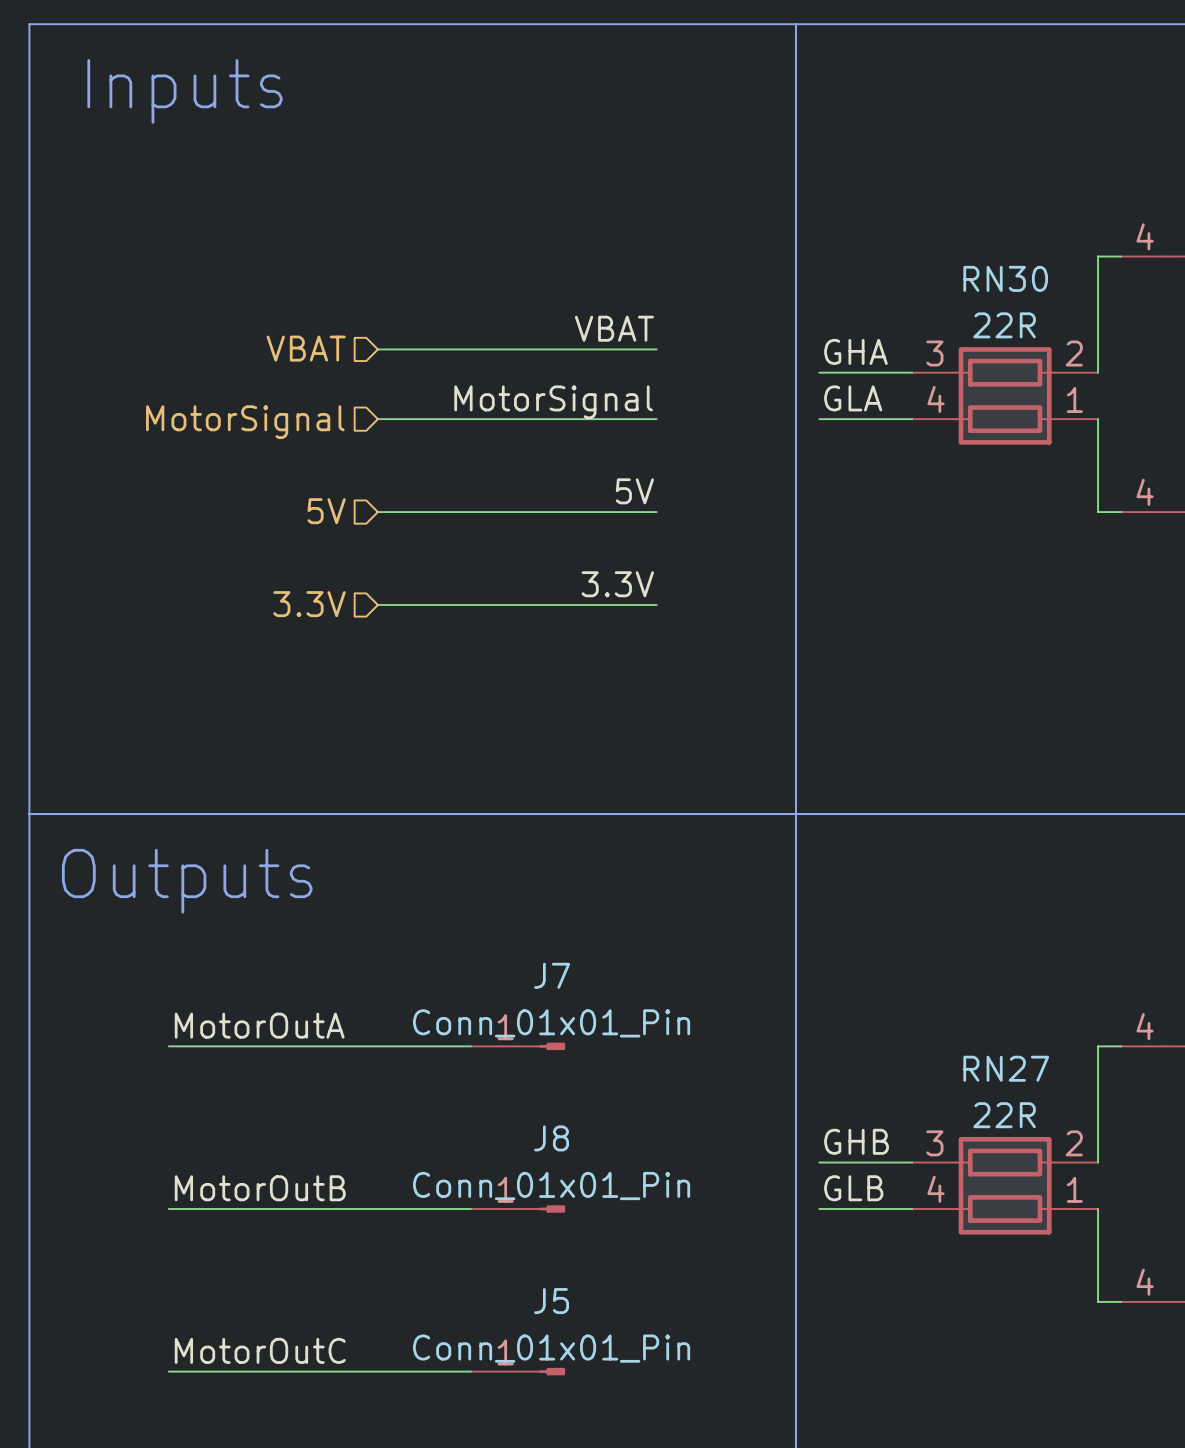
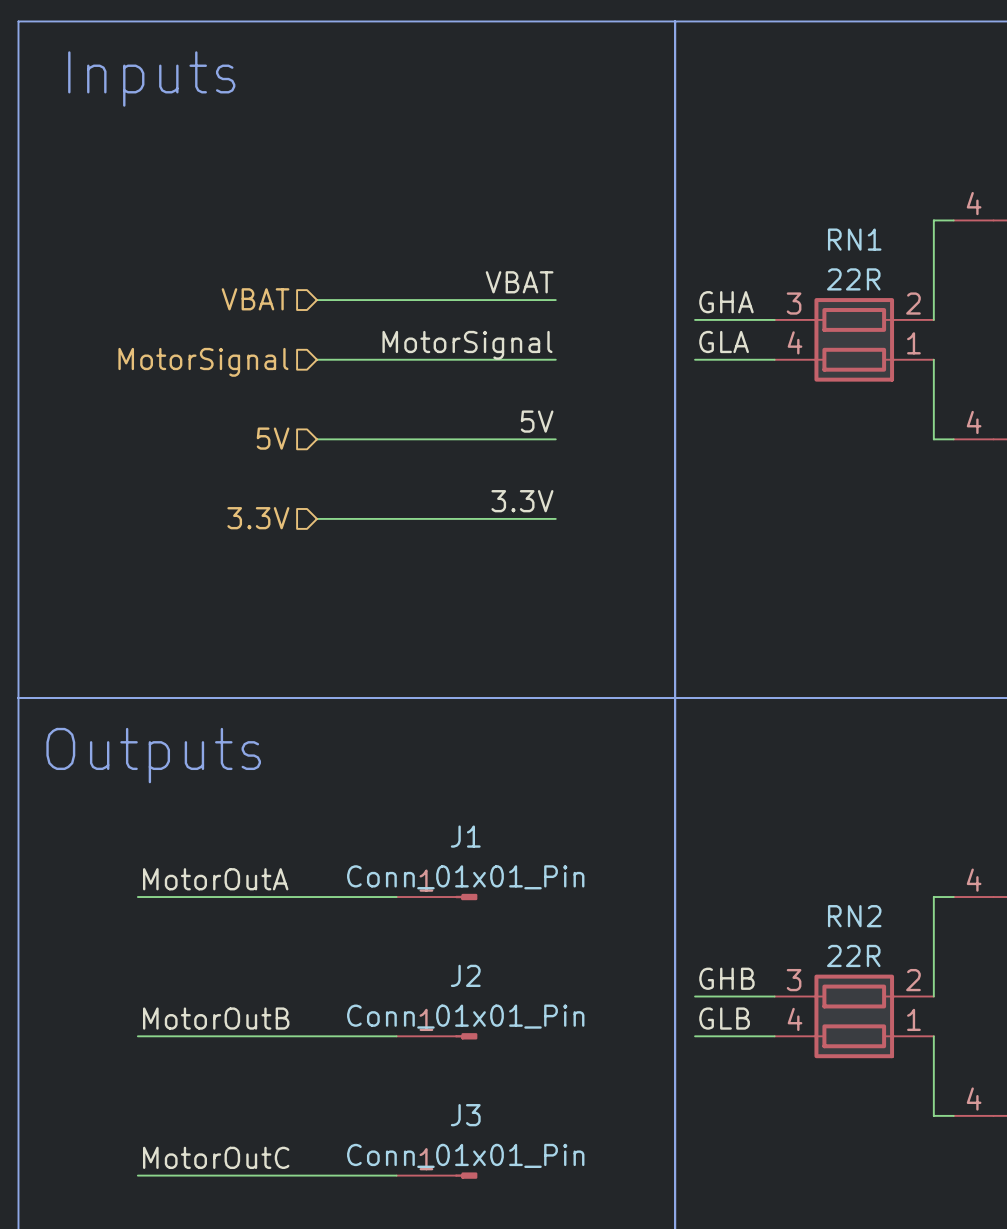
RN30 name: RN30 (1005, 278) -> RN1 (854, 239)
J7 name: J7 (552, 975) -> J1 (465, 836)
RN27 name: RN27 (1006, 1068) -> RN2 (854, 916)
J8 name: J8 (551, 1138) -> J2 (465, 975)
J5 name: J5 (551, 1301) -> J3 (465, 1115)

